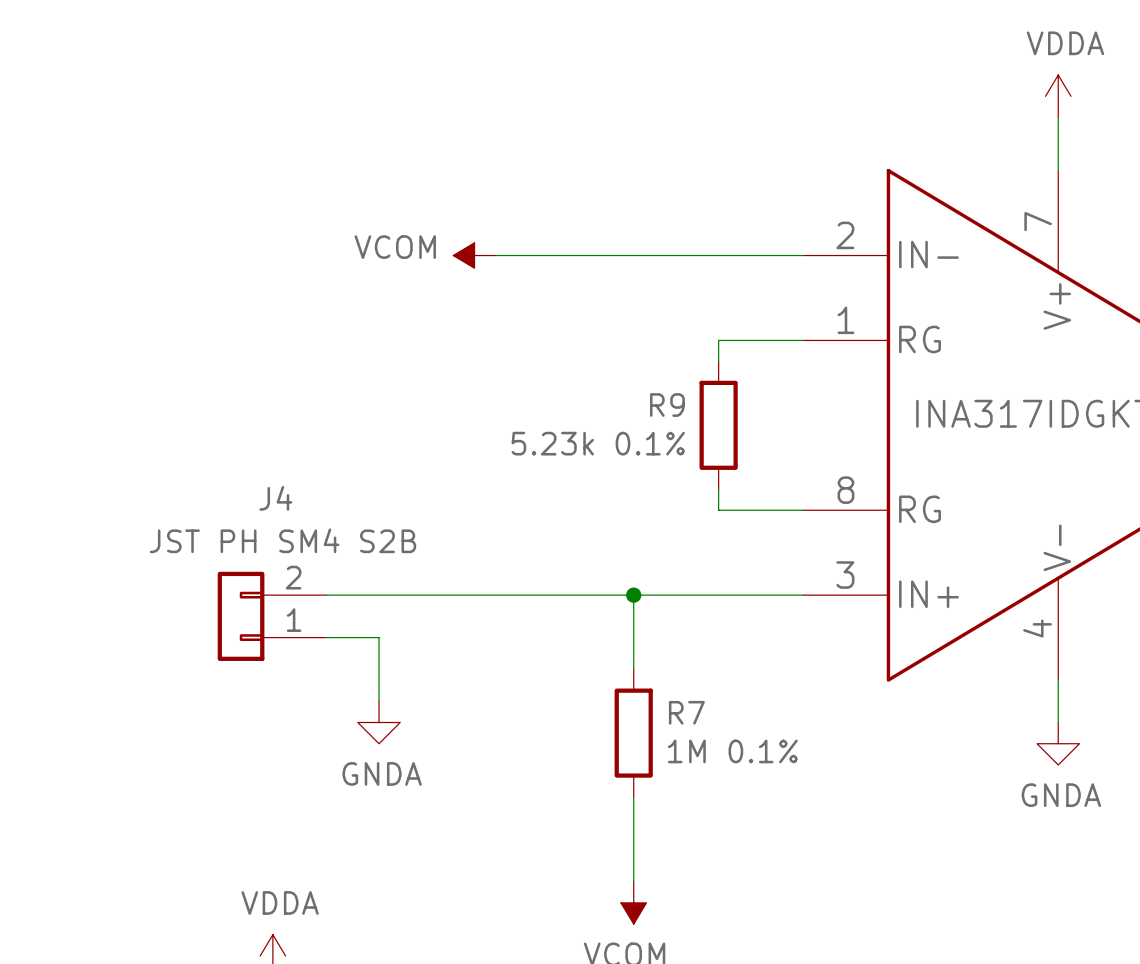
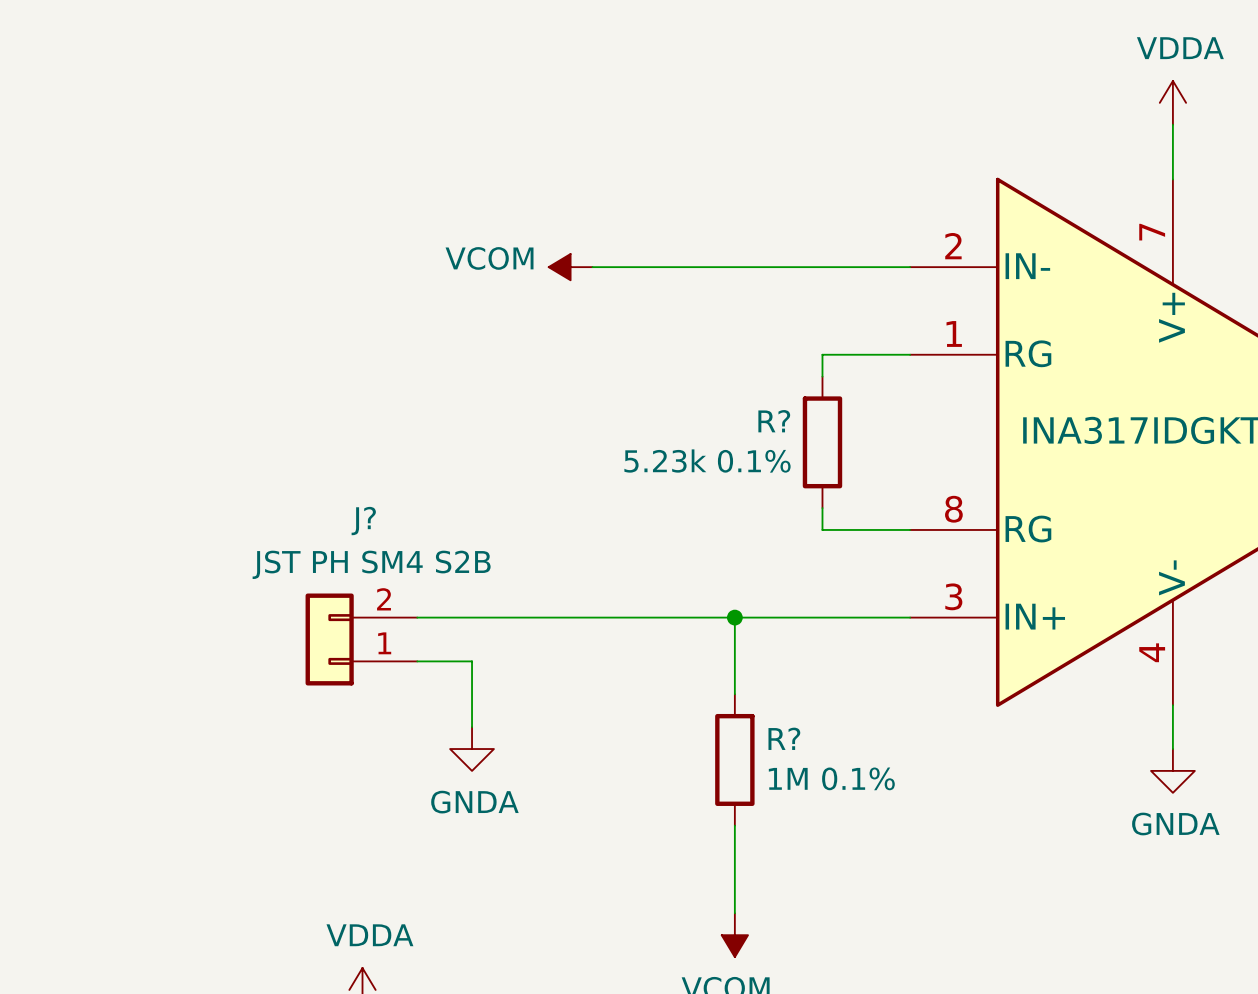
R9 name: R9 (667, 405) -> R? (774, 421)
J4 name: J4 (275, 498) -> J? (363, 521)
R7 name: R7 (686, 712) -> R? (784, 738)

